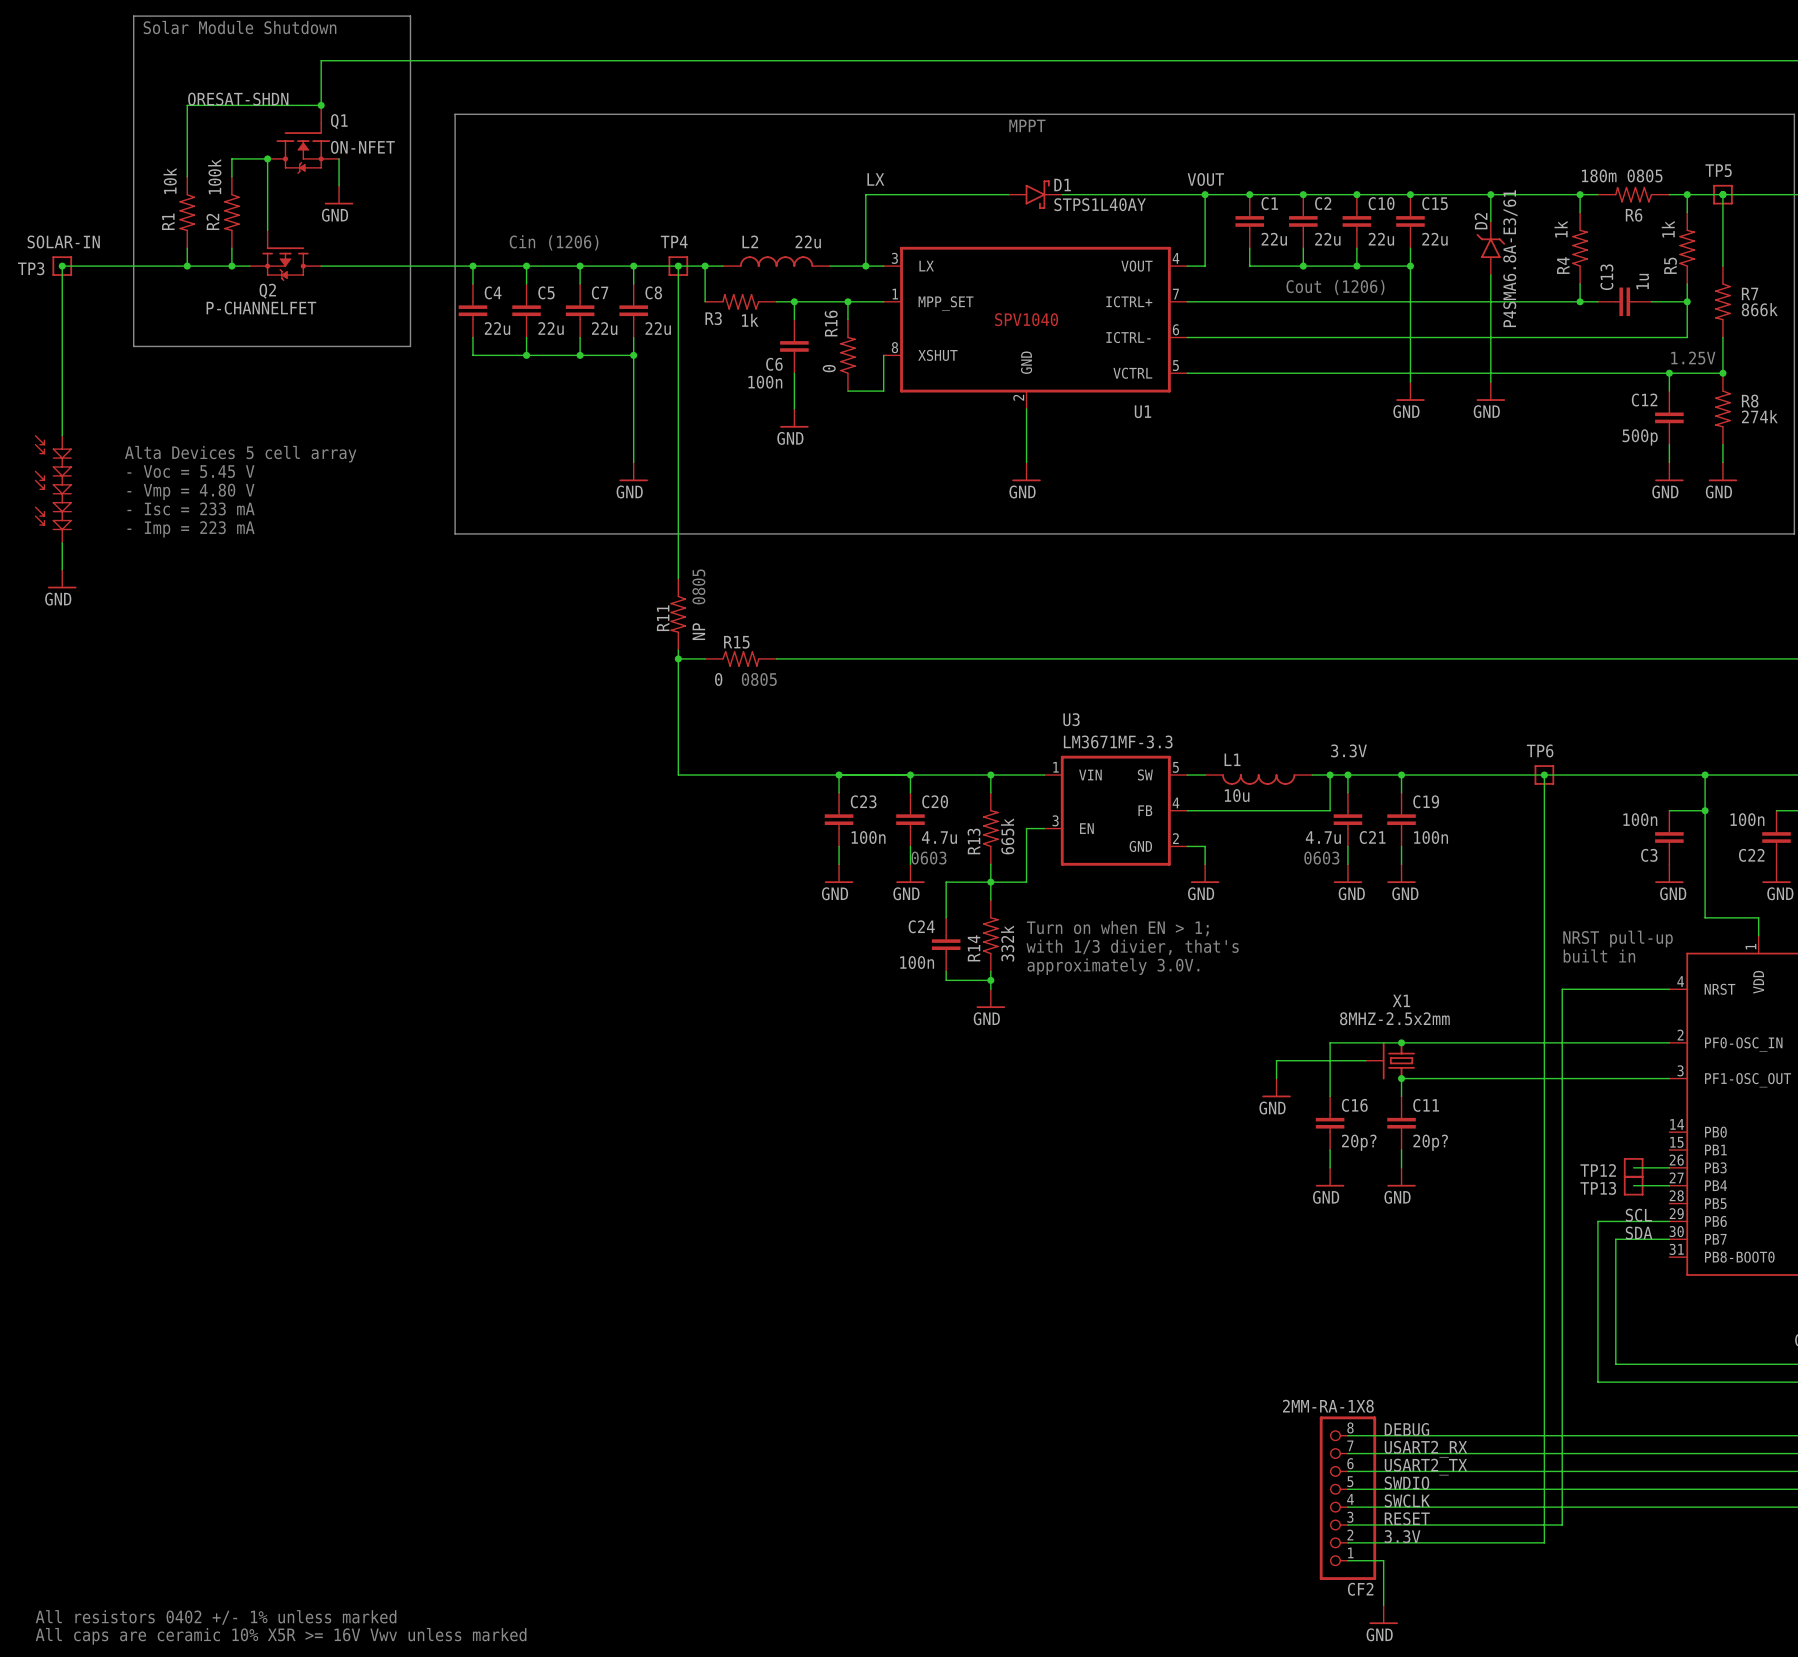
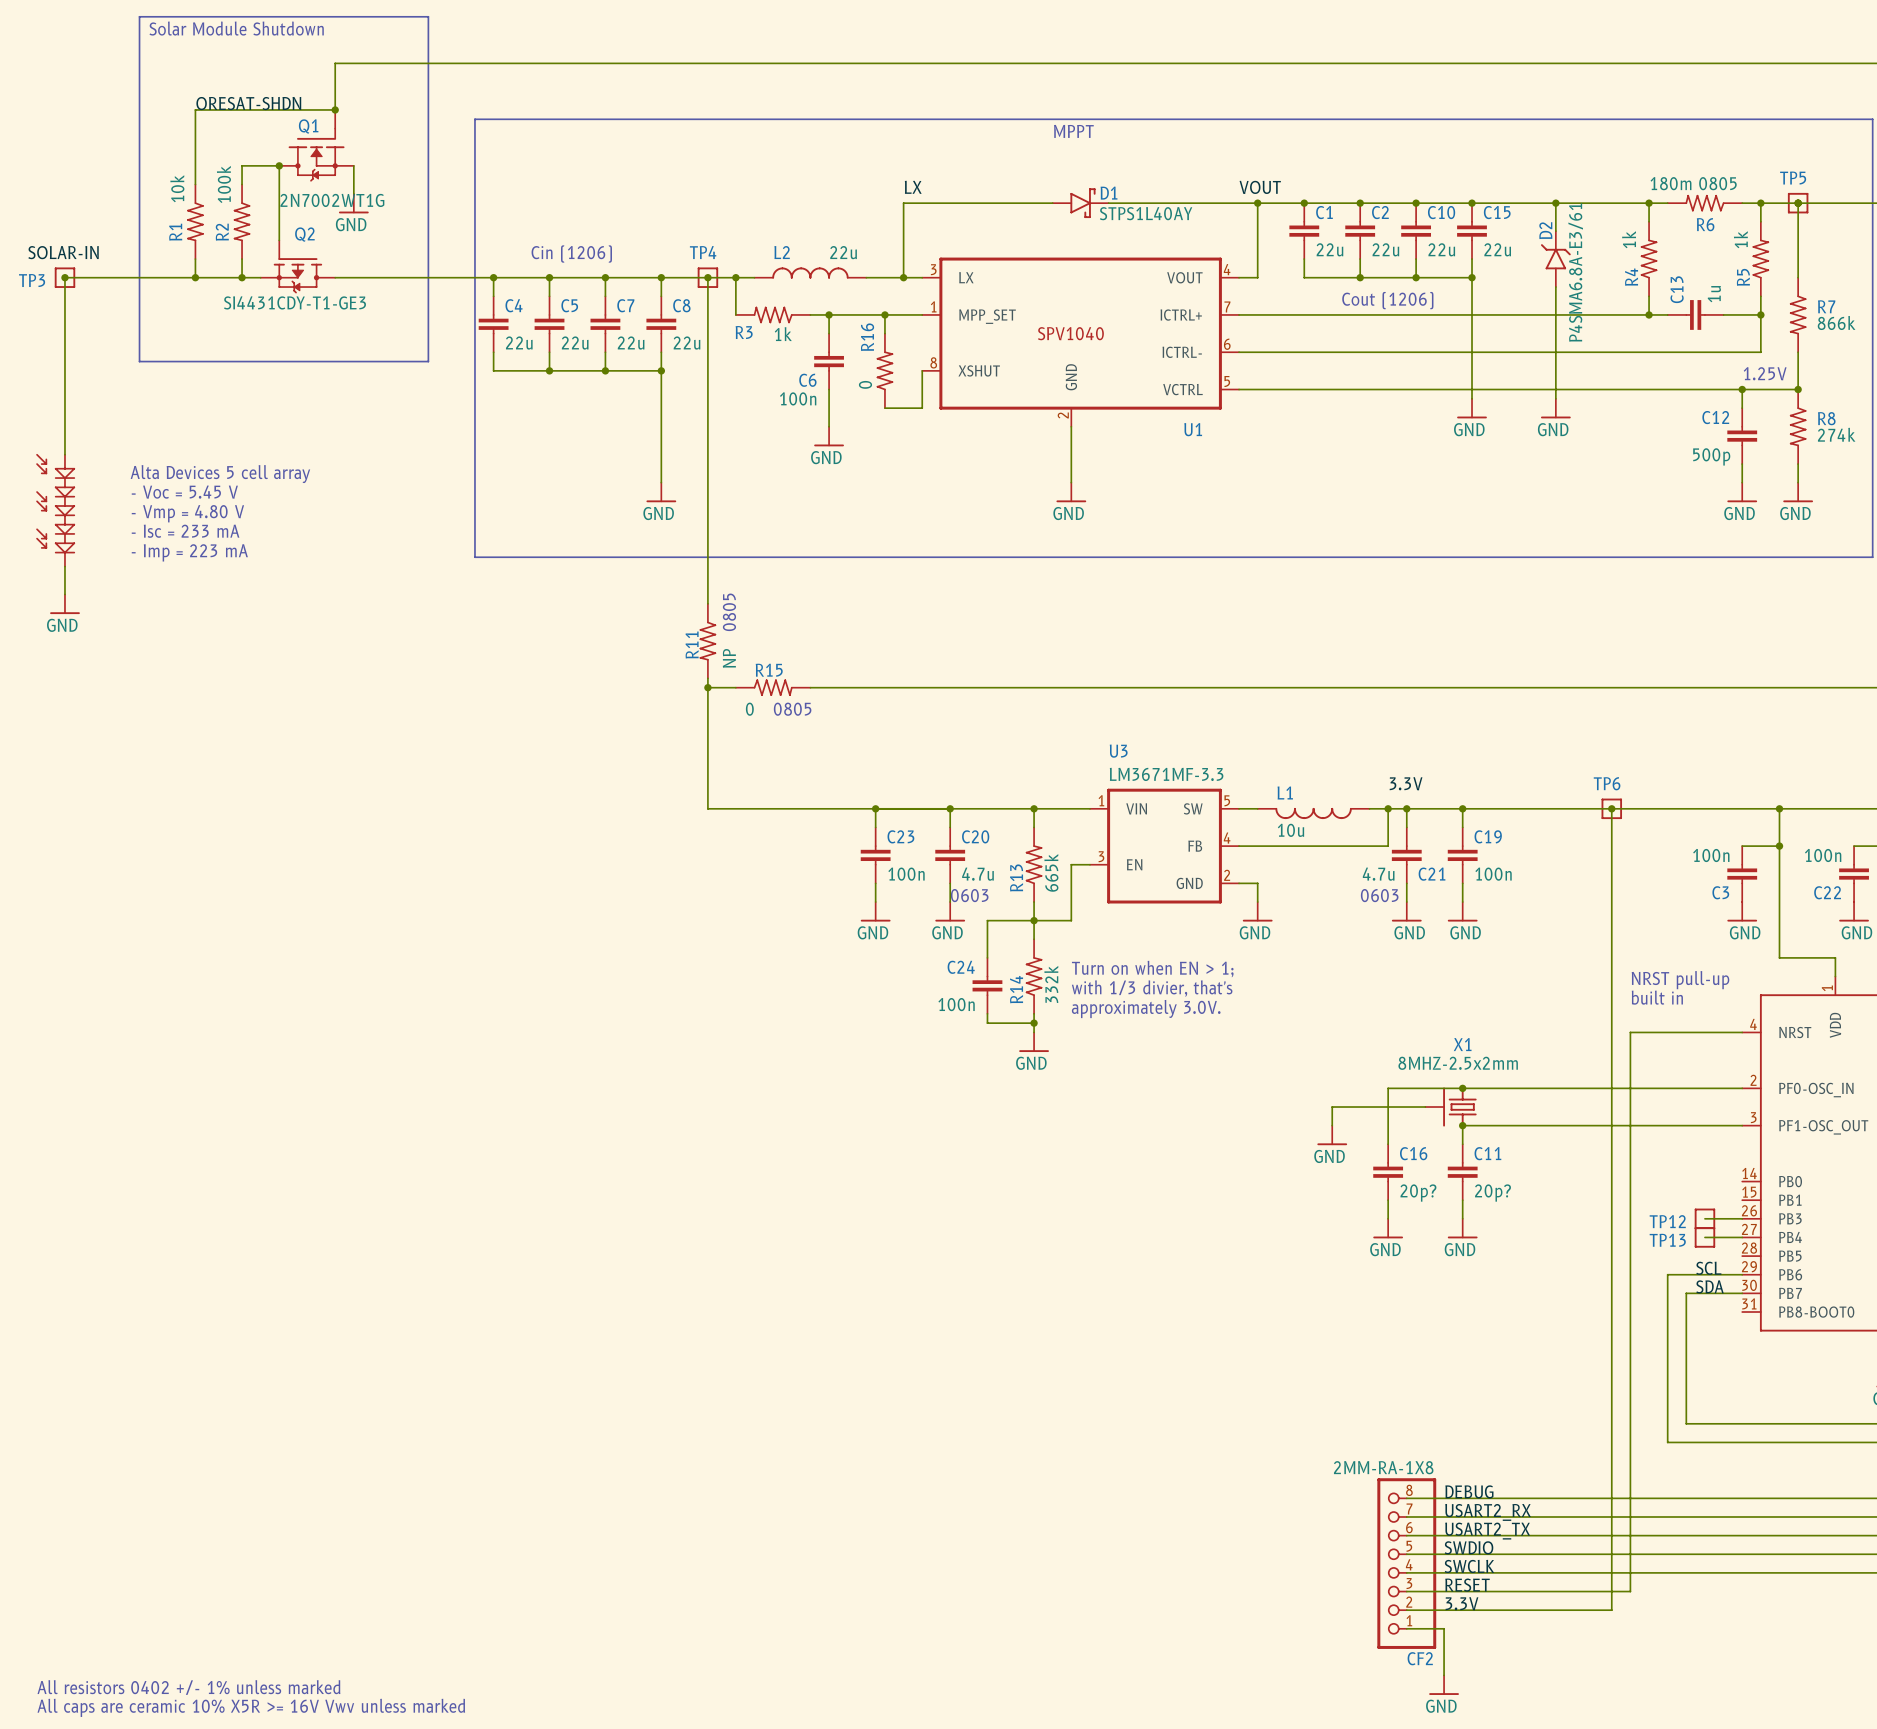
Q1 name position: Q1 (339, 121) -> Q1 (308, 126)
Q1 value: ON-NFET (362, 147) -> 2N7002WT1G (332, 200)
Q2 name position: Q2 (267, 291) -> Q2 (304, 234)
Q2 value: P-CHANNELFET (261, 308) -> SI4431CDY-T1-GE3 (294, 302)

